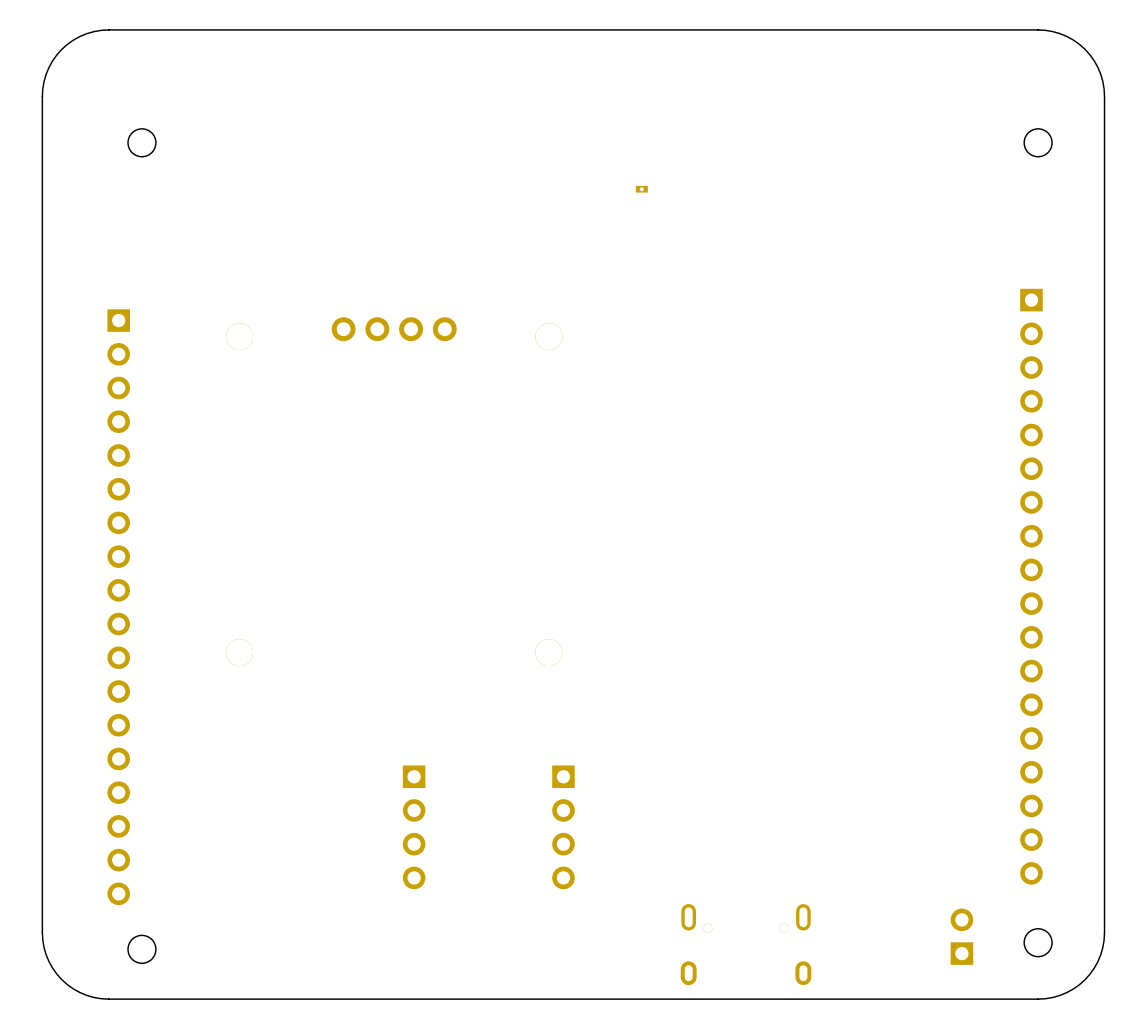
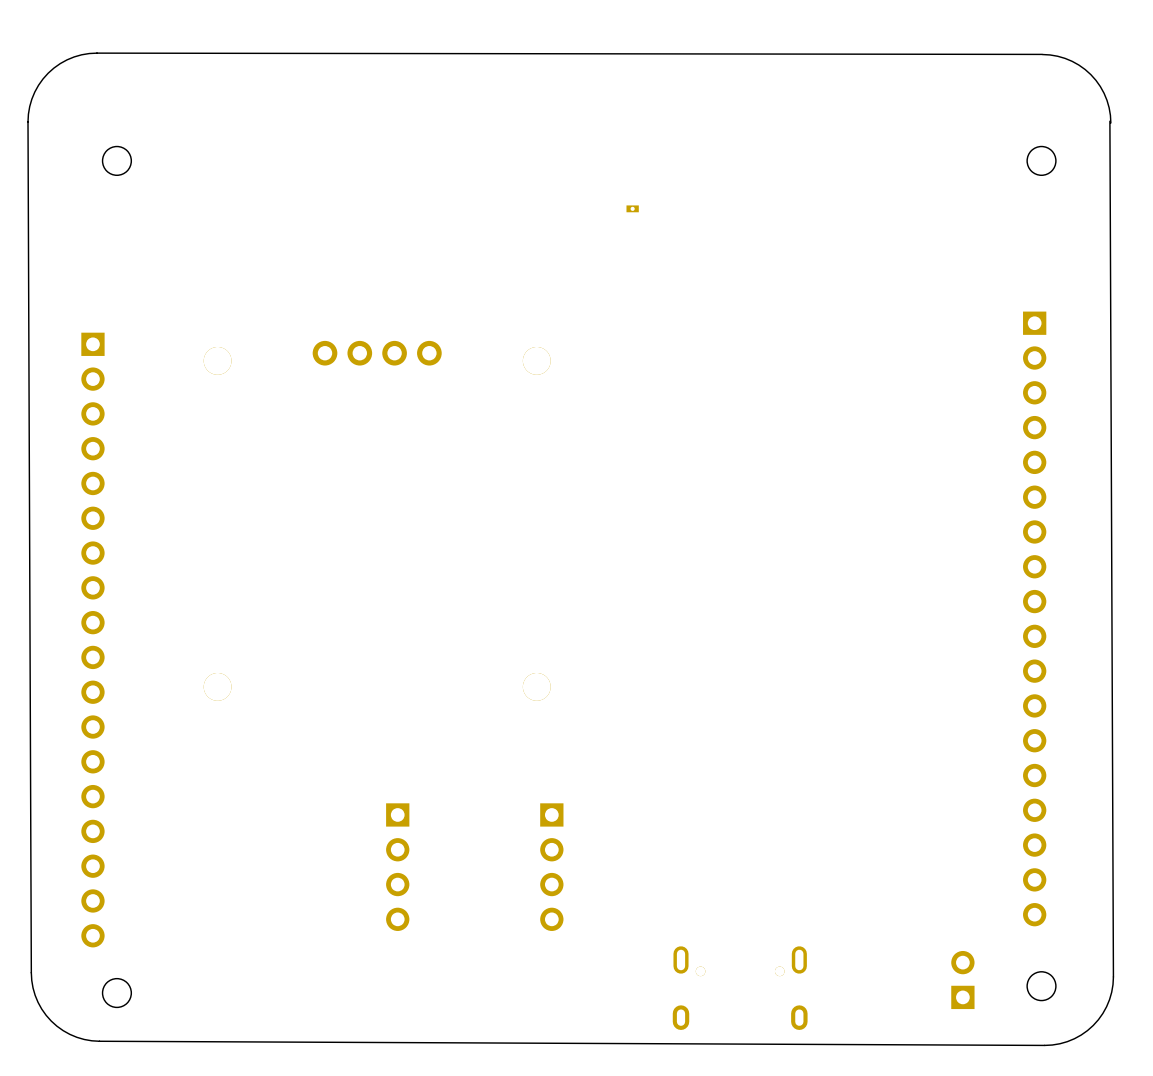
board edge: (1038, 29) (108, 29) (93, 31) (79, 36) (61, 49) (48, 67) (44, 81) (42, 96) (42, 932) (44, 947) (48, 961) (61, 979) (73, 988) (86, 995) (108, 999) (1038, 999) (1060, 995) (1073, 988) (1085, 979) (1094, 968) (1100, 954) (1104, 932) (1104, 96) (1100, 74) (1094, 61) (1085, 49) (1073, 40) (1060, 33) (1038, 29) -> none
board edge: none -> (1042, 54) (96, 53) (81, 54) (67, 59) (48, 73) (38, 85) (31, 99) (27, 121) (31, 972) (35, 995) (41, 1009) (51, 1021) (69, 1034) (84, 1039) (99, 1041) (1044, 1045) (1067, 1041) (1087, 1030) (1098, 1019) (1106, 1006) (1111, 992) (1113, 976) (1109, 121)
board edge: none -> (1042, 54) (1057, 56) (1072, 61) (1090, 74) (1104, 93) (1109, 107) (1110, 123)

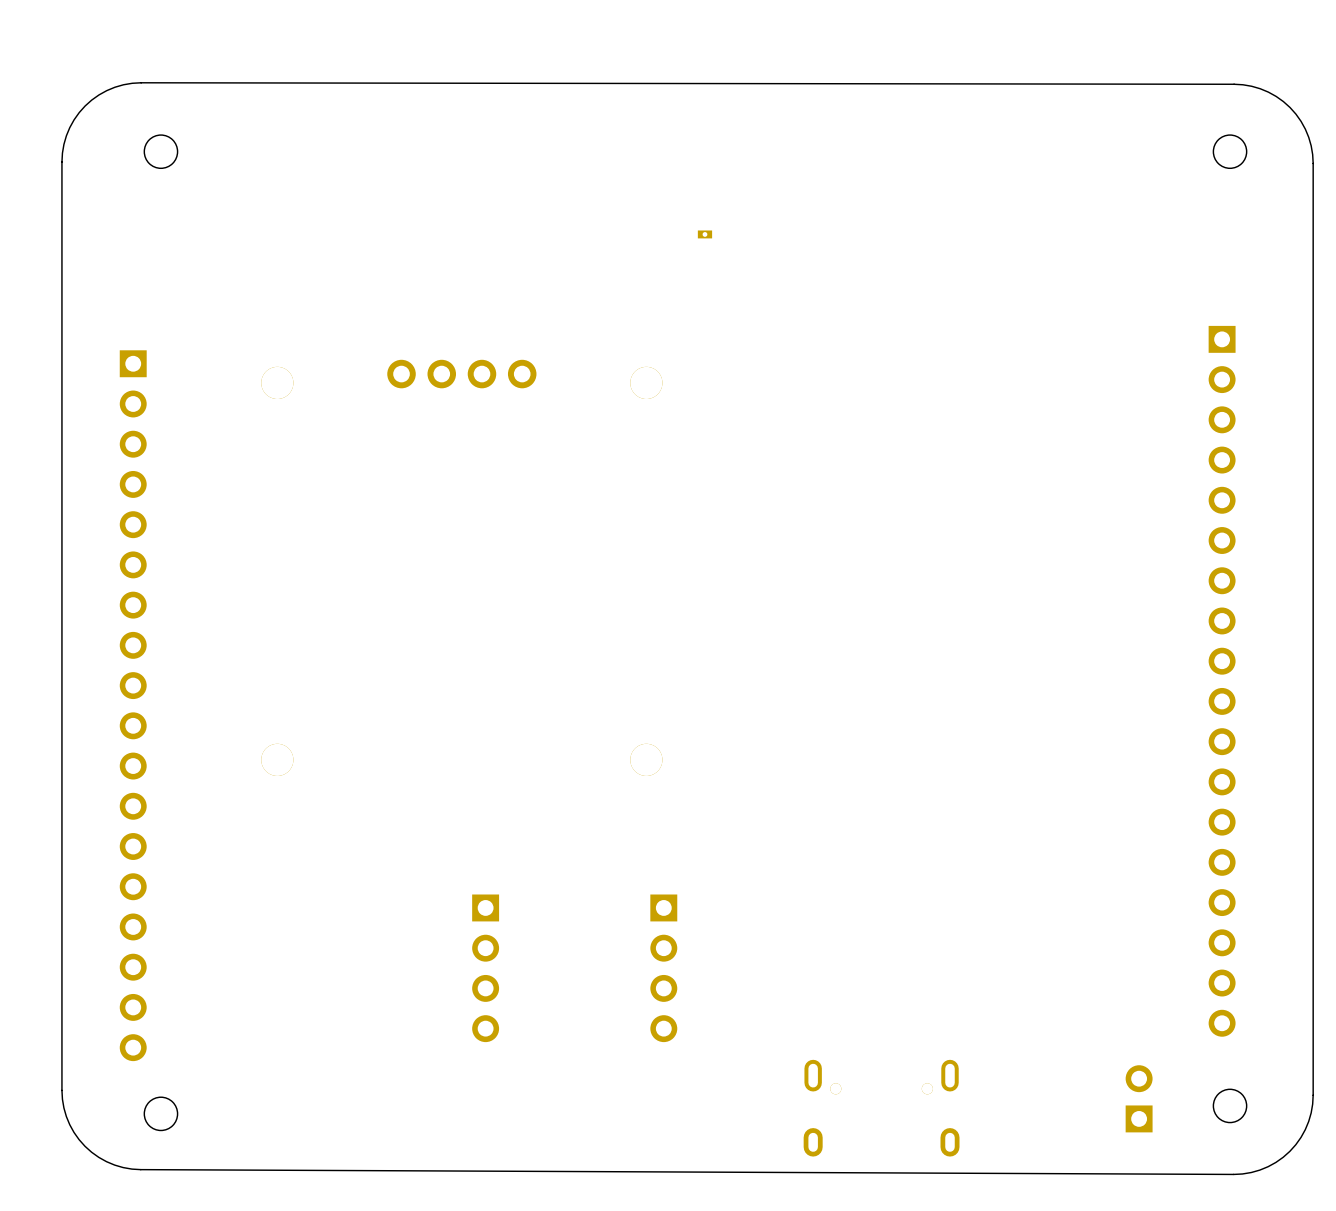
board edge: (1042, 54) (96, 53) (81, 54) (67, 59) (48, 73) (38, 85) (31, 99) (27, 121) (31, 972) -> (1313, 1095) (1312, 154) (1308, 137) (1301, 121) (1283, 101) (1260, 88) (1234, 84) (141, 82) (114, 87) (91, 100) (79, 112) (69, 127) (63, 144) (61, 161) (61, 1090)
board edge: (1042, 54) (1057, 56) (1072, 61) (1090, 74) (1104, 93) (1109, 107) (1110, 123) -> none
board edge: (1109, 121) (1113, 976) -> none
part position: (632, 208) -> (704, 234)

